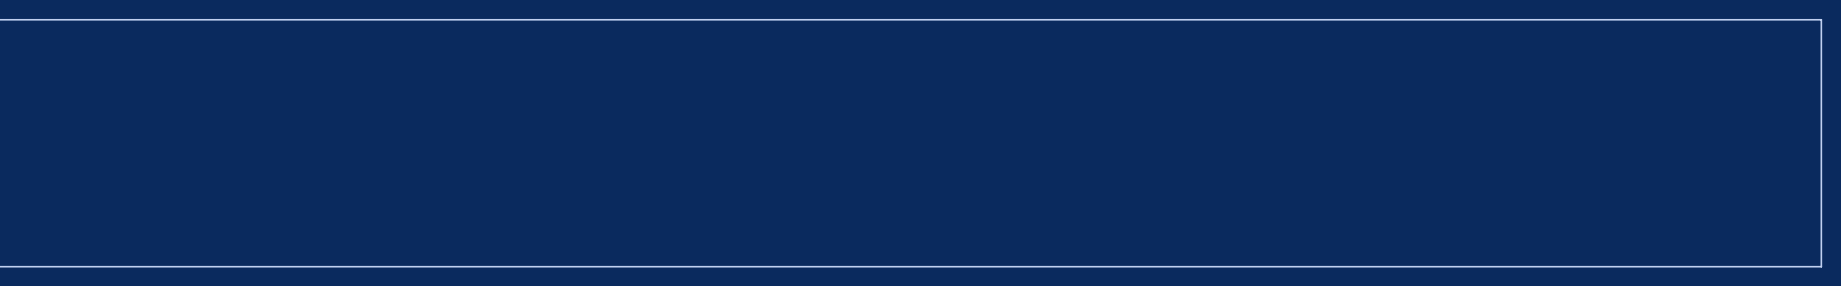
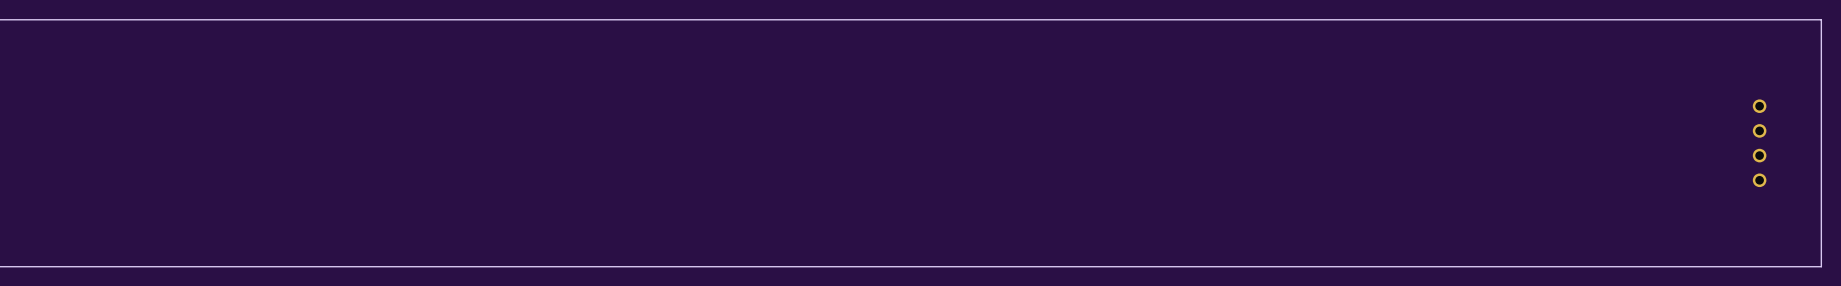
part: none -> (1759, 143)

